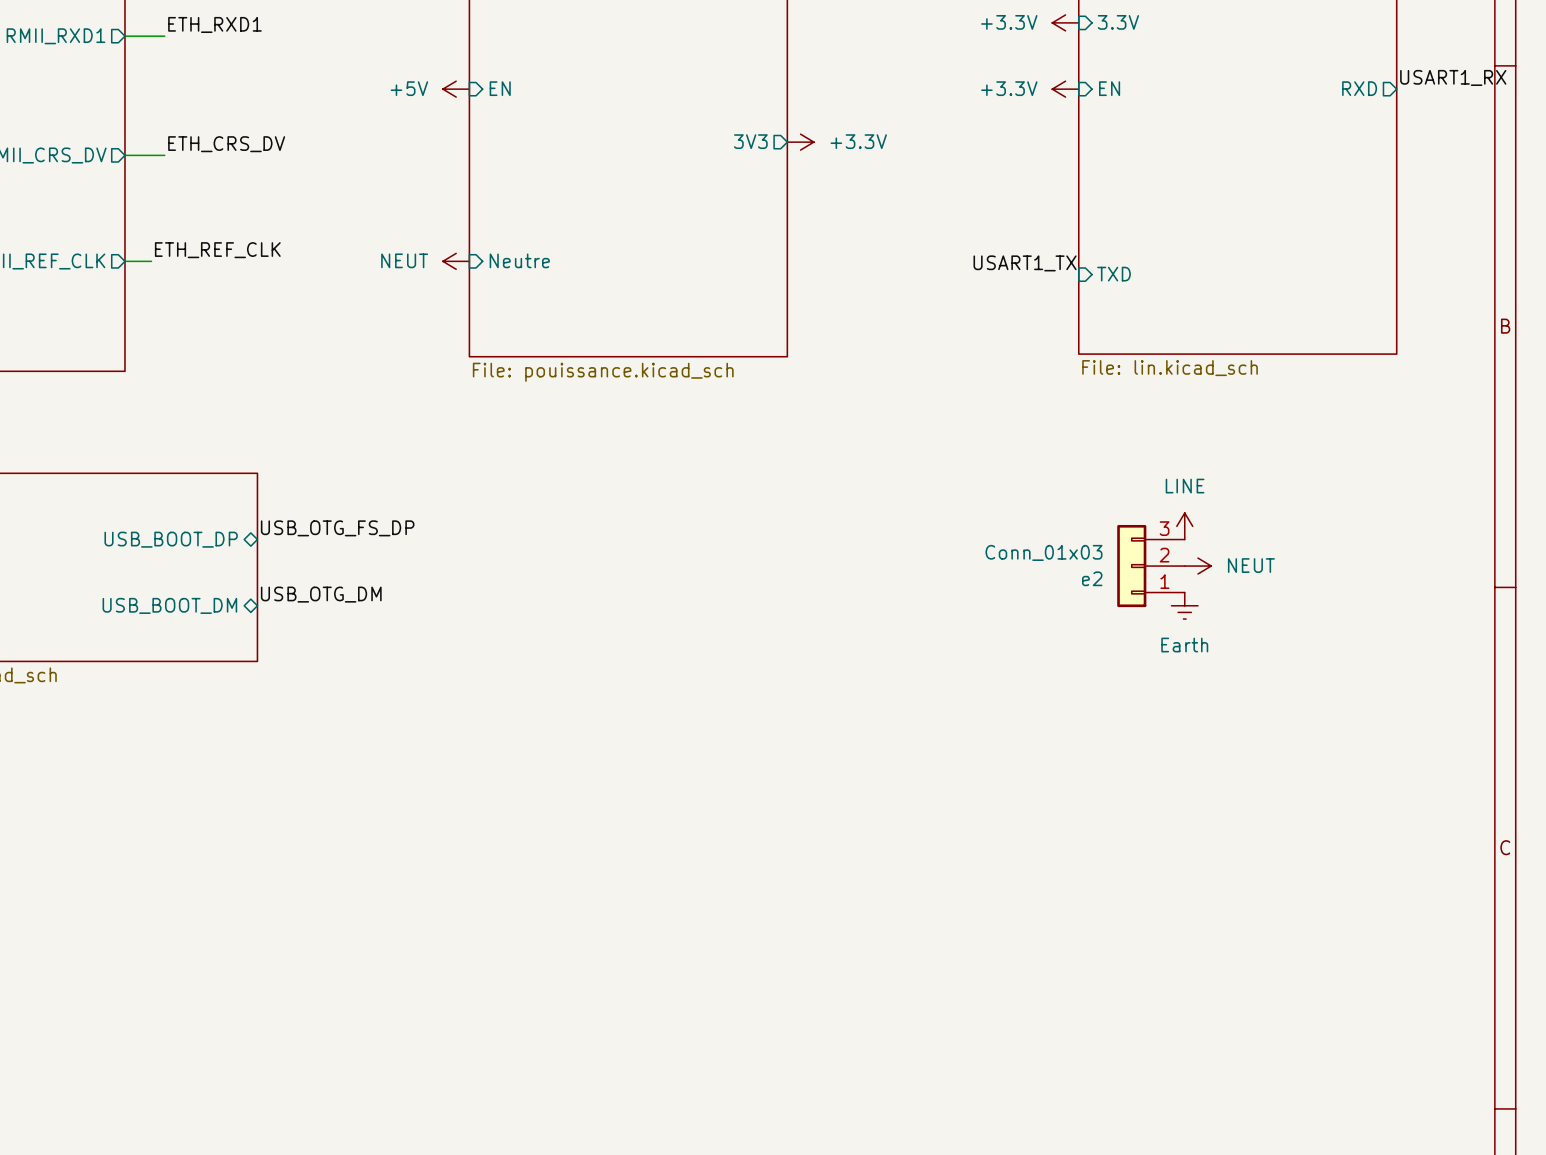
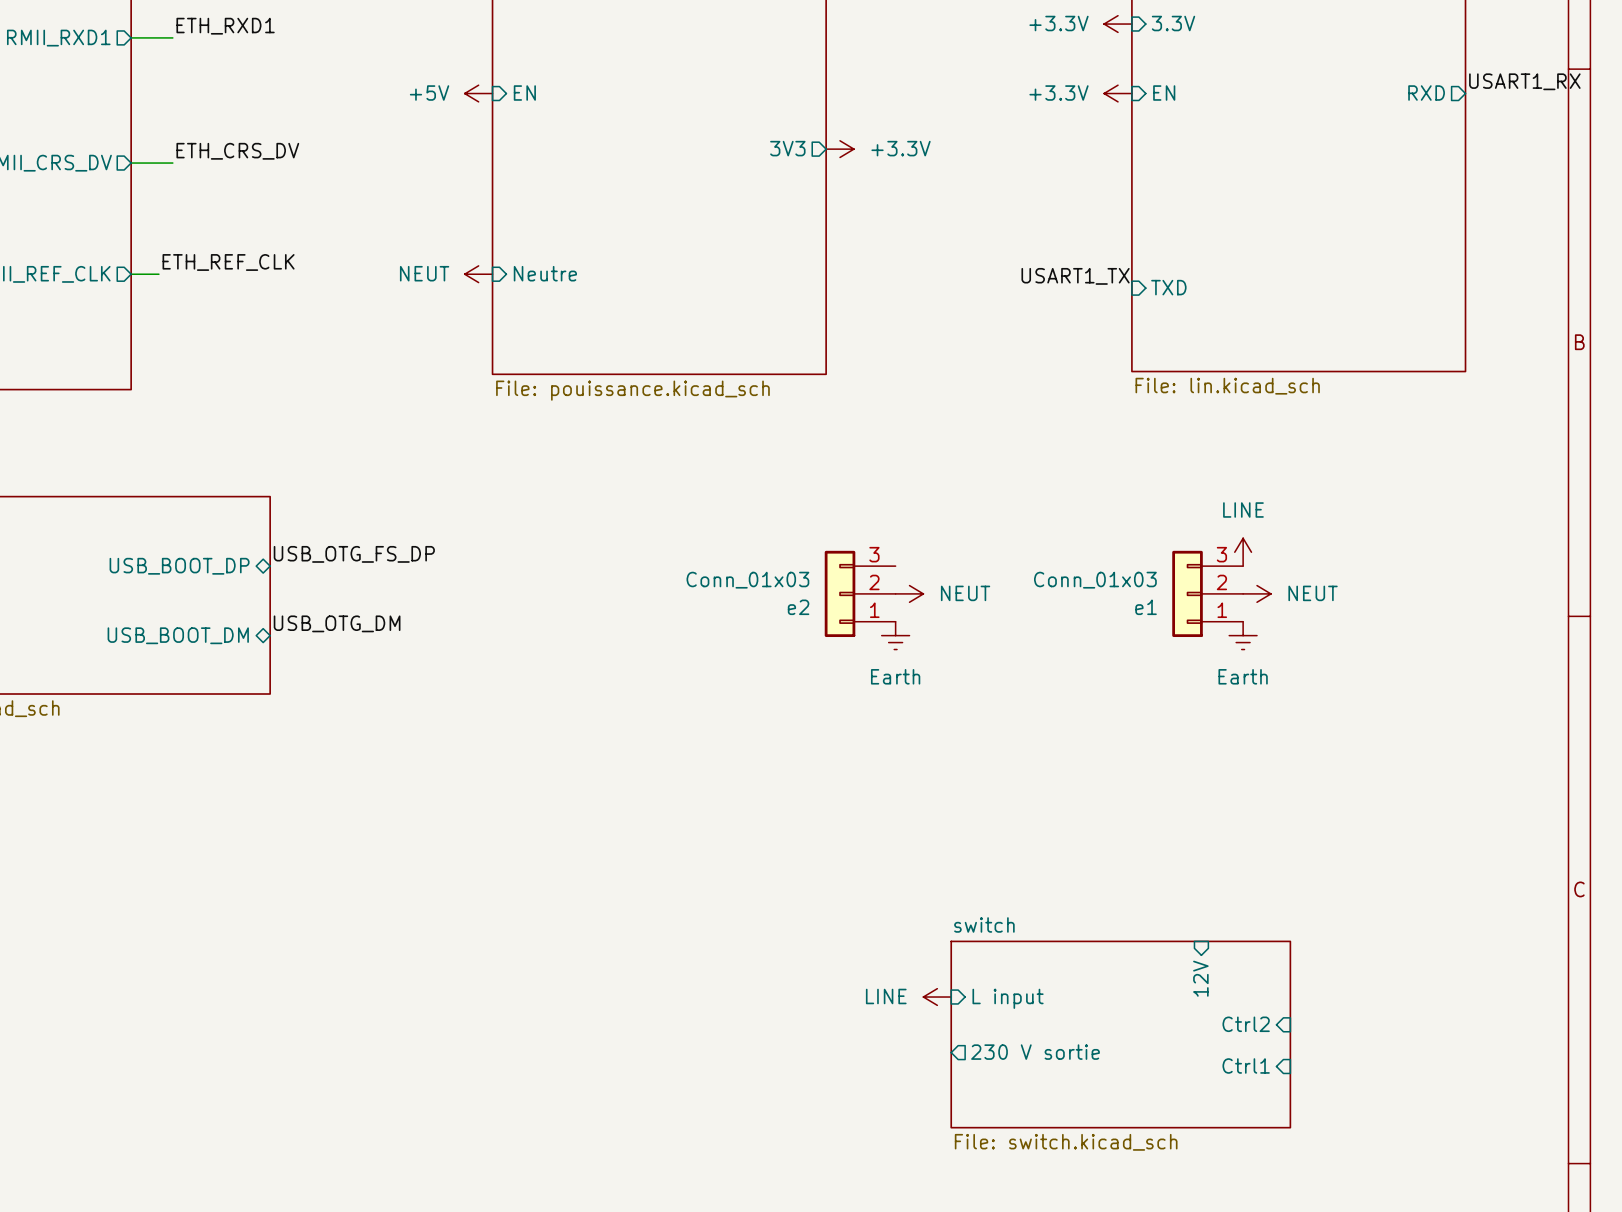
e2: none -> Conn_01x03 (860, 593)
power symbol: none -> NEUT (909, 593)
e2 name: e2 (1092, 578) -> e1 (1146, 607)
power symbol: none -> Earth (895, 635)
sheet pin: none -> 12V (1200, 978)
power symbol: none -> LINE (937, 997)
sheet pin: none -> L input (1008, 998)
sheet pin: none -> Ctrl2 (1246, 1024)
sheet switch: none -> File: switch.kicad_sch (1120, 1034)
sheet pin: none -> 230 V sortie (1035, 1052)
sheet pin: none -> Ctrl1 (1246, 1065)

